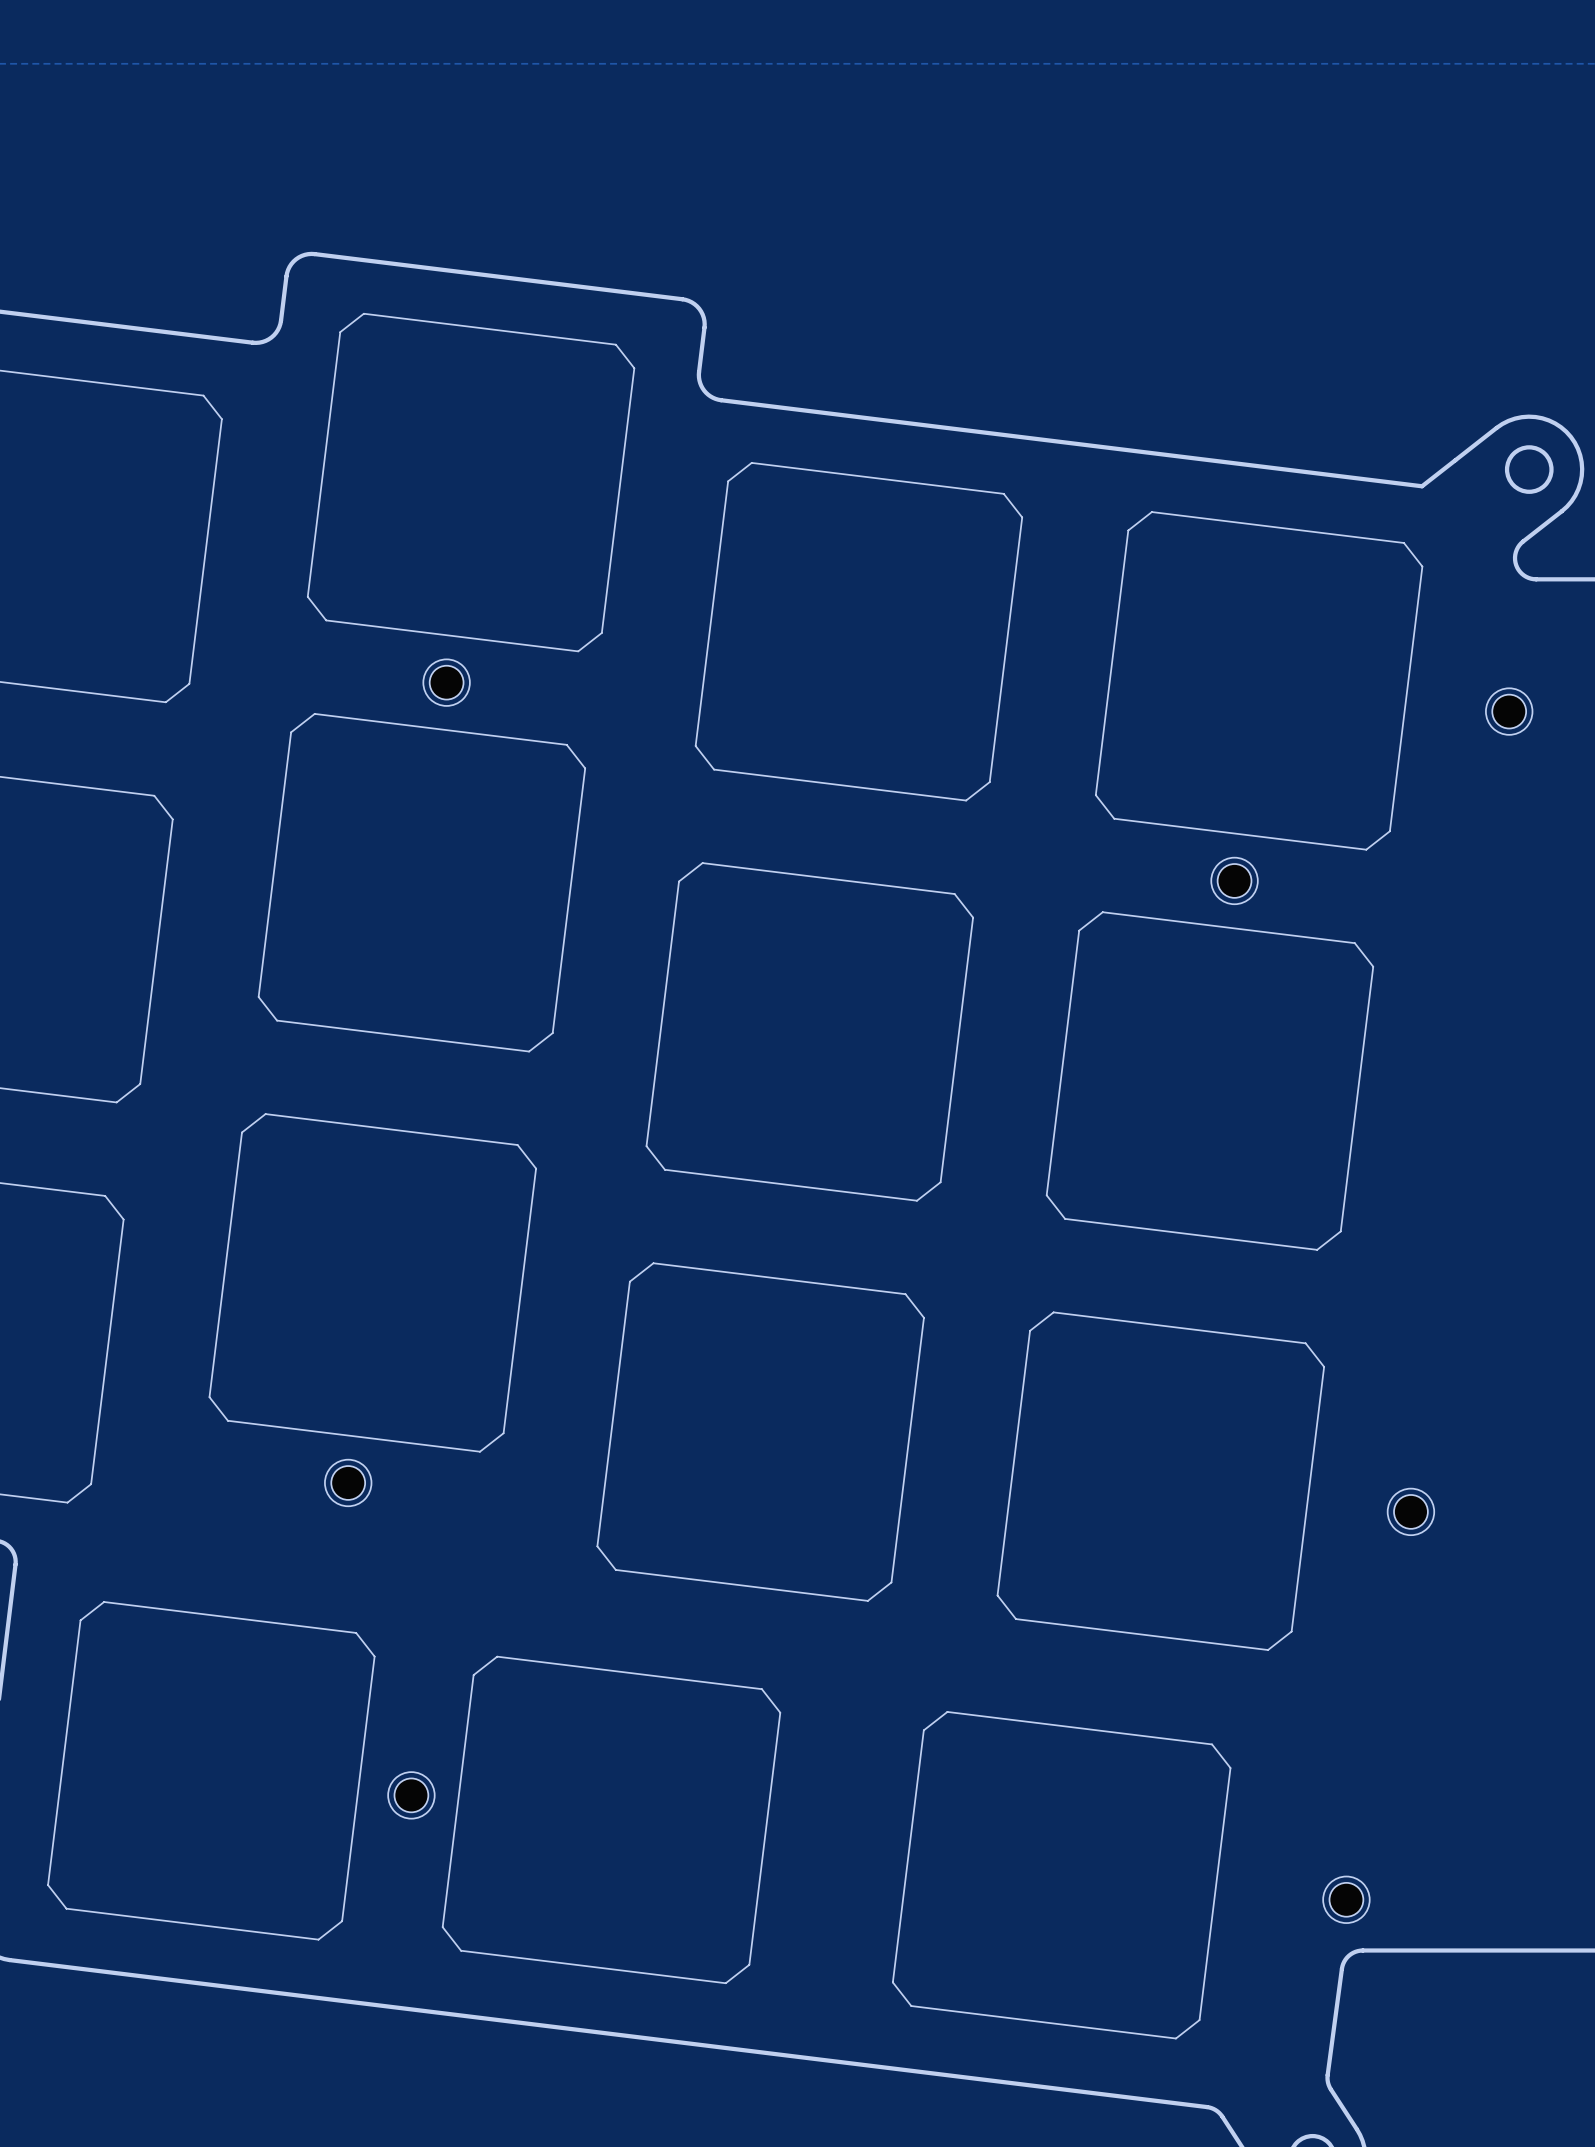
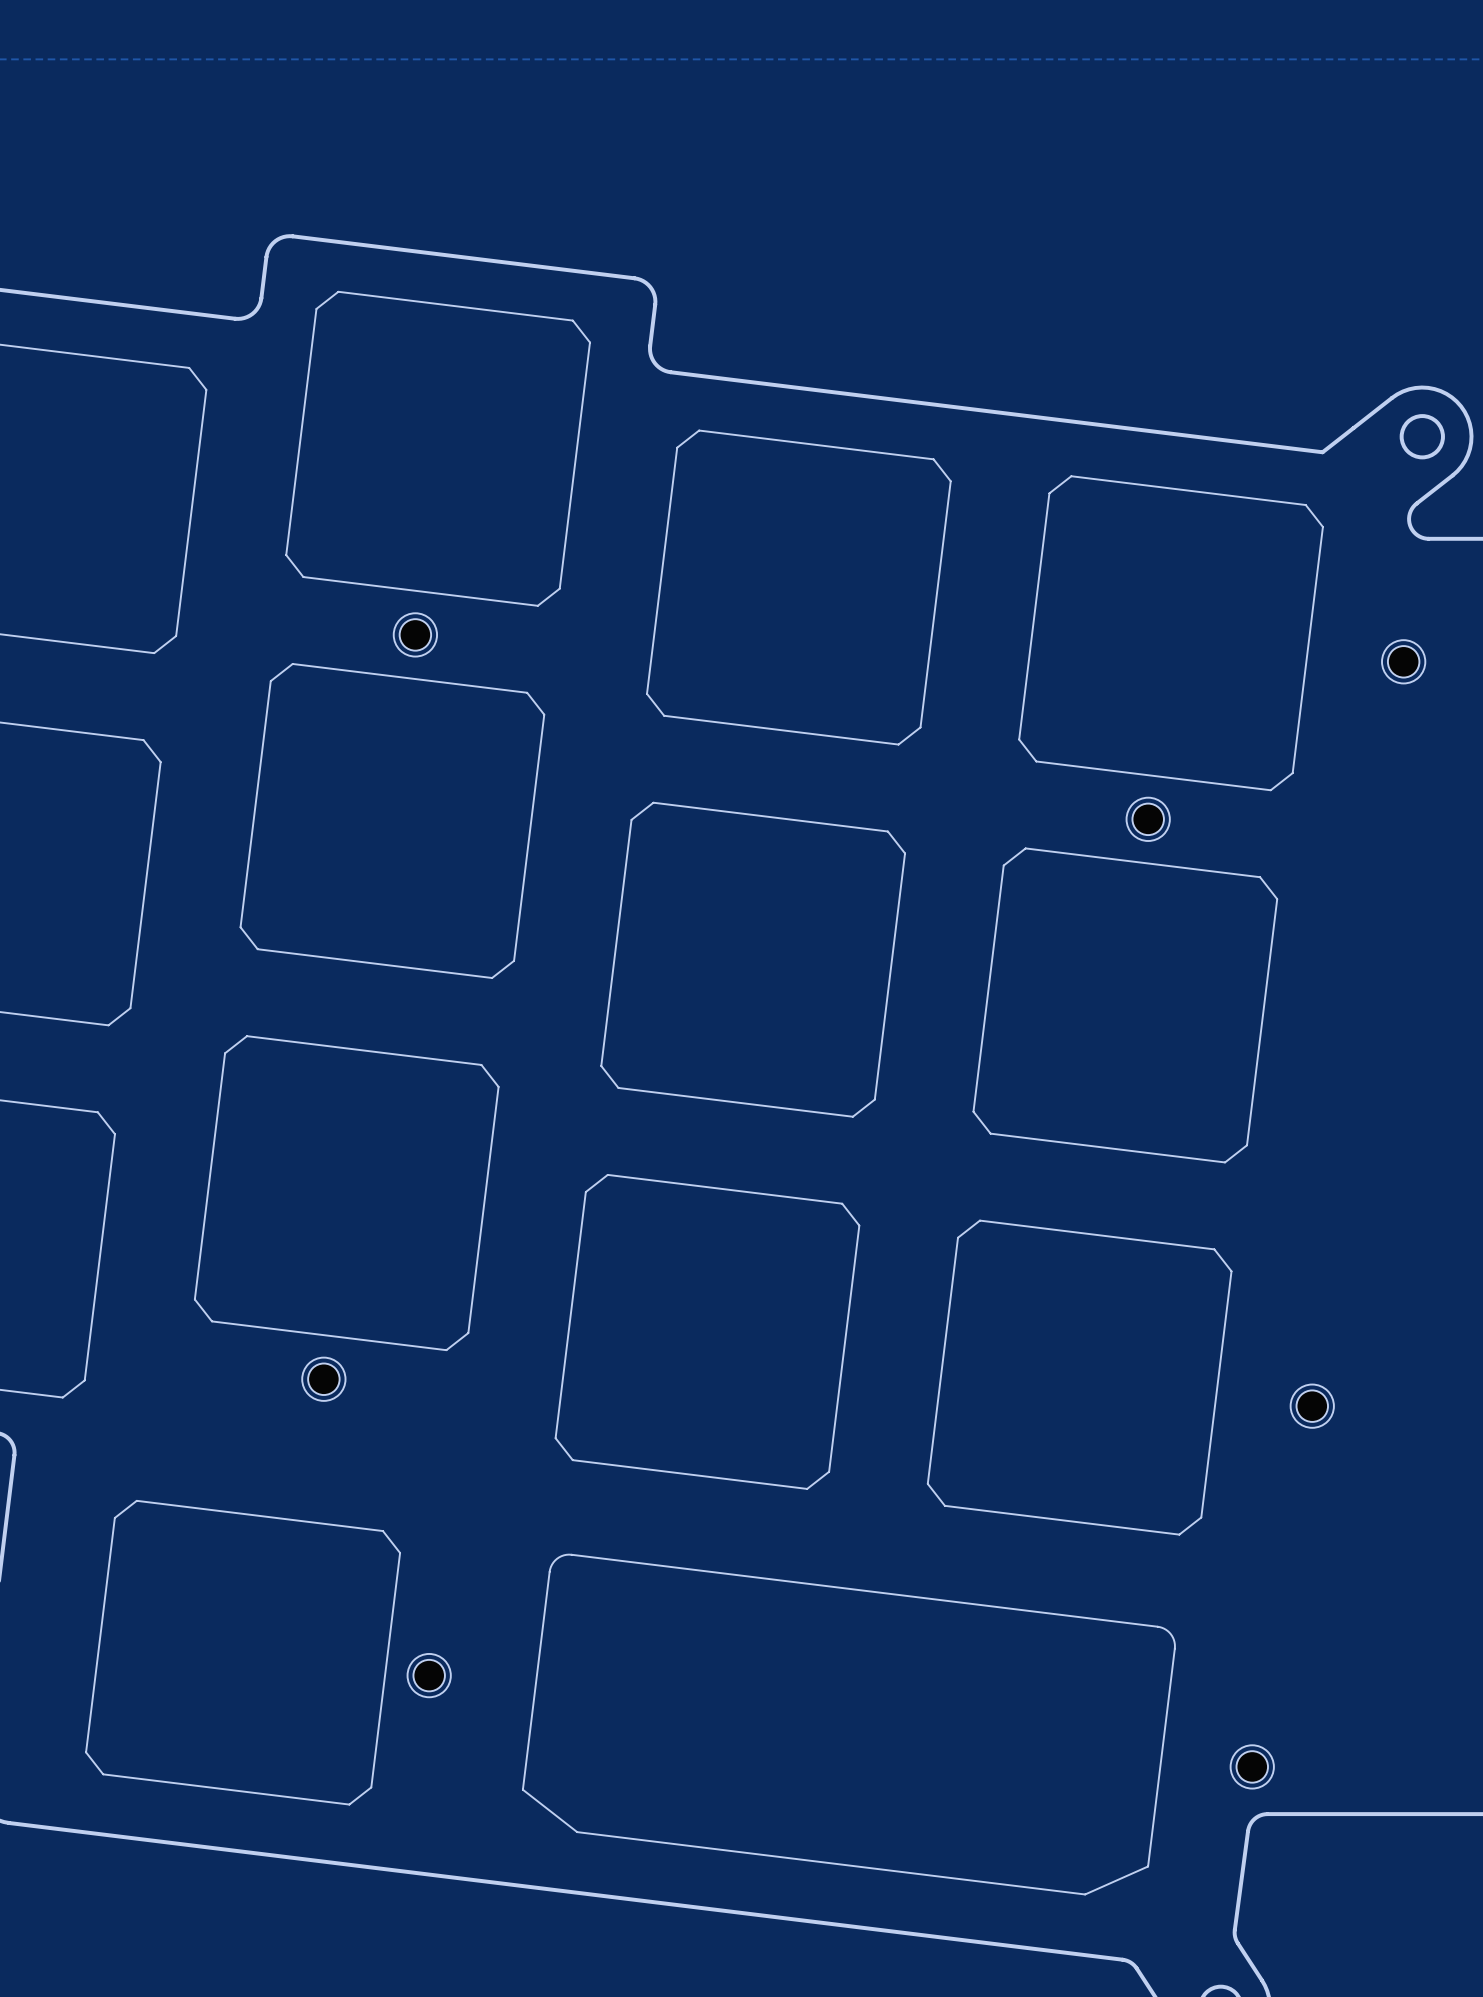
drawing: [47, 1601, 376, 1941] -> none
drawing: none -> [522, 1554, 1176, 1895]
drawing: [892, 1711, 1232, 2040] -> none
part position: (411, 1795) -> (429, 1675)
drawing position: (611, 1819) -> (243, 1652)

